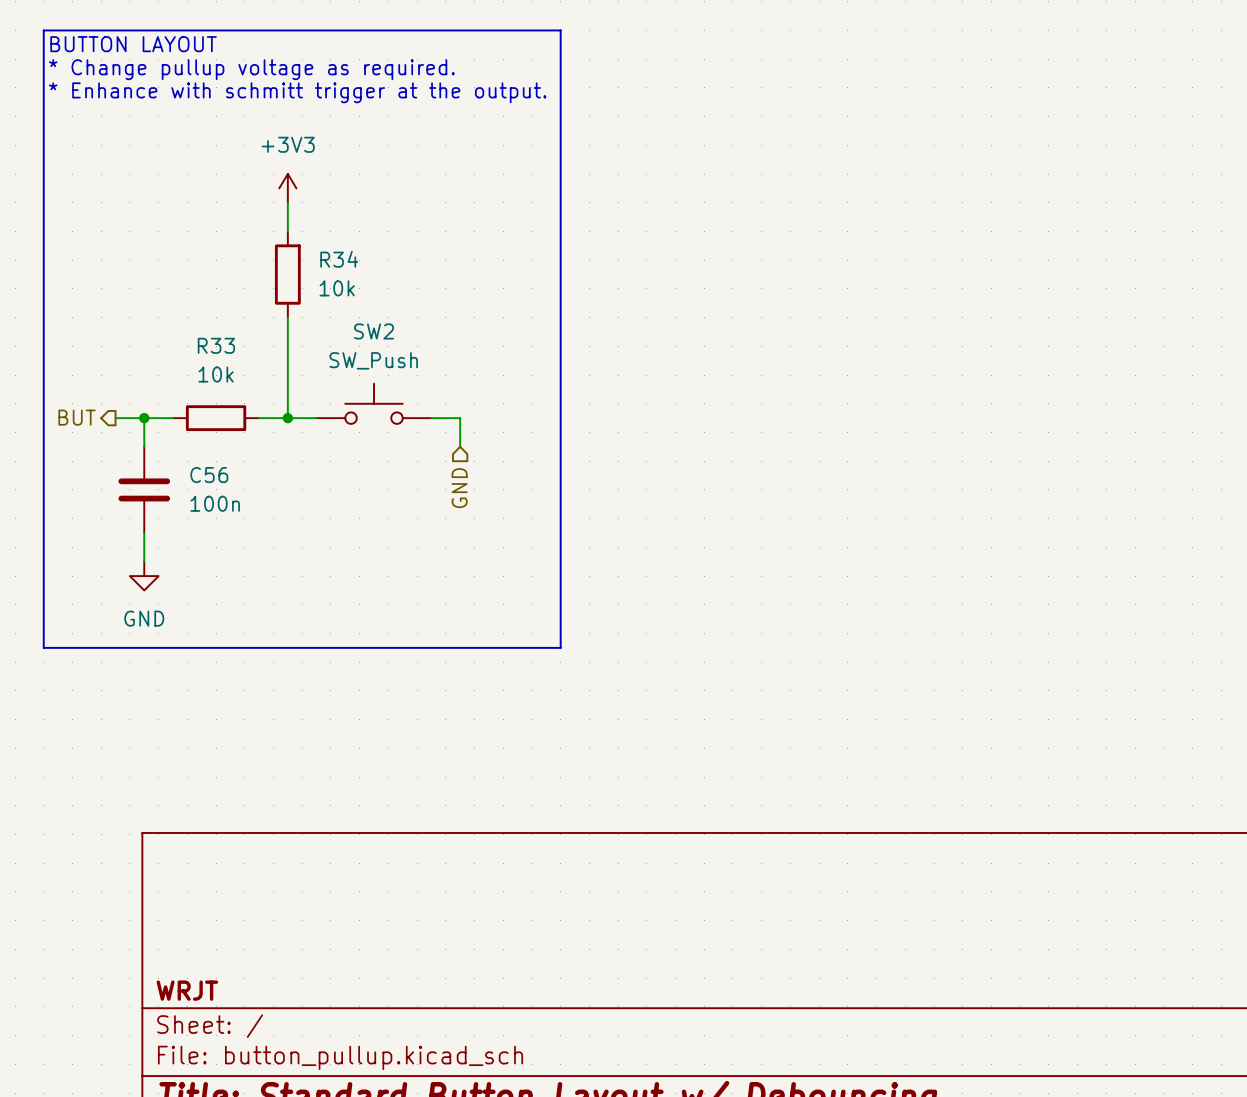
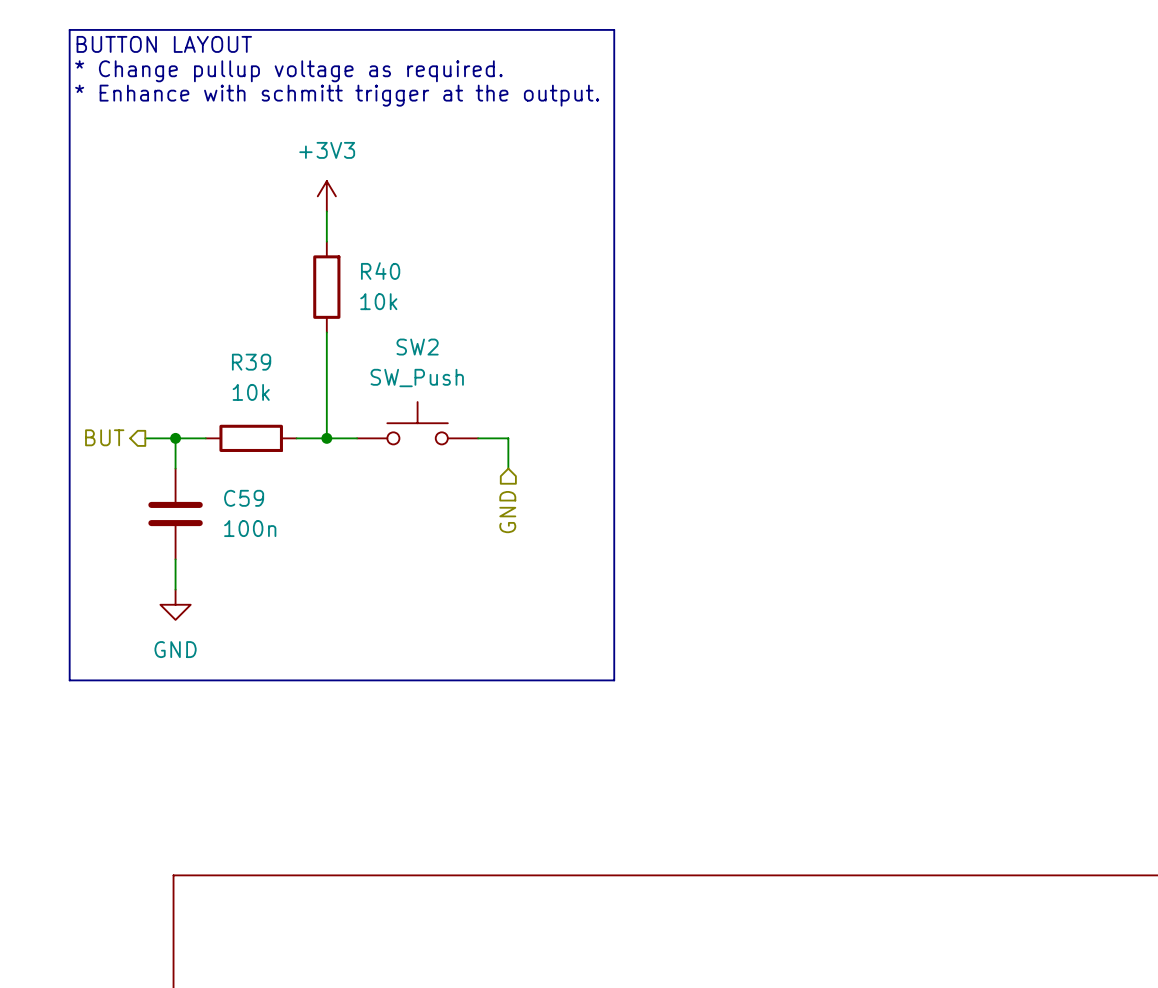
R34 name: R34 (339, 259) -> R40 (380, 271)
R33 name: R33 (216, 345) -> R39 (251, 362)
C56 name: C56 (209, 475) -> C59 (244, 498)

